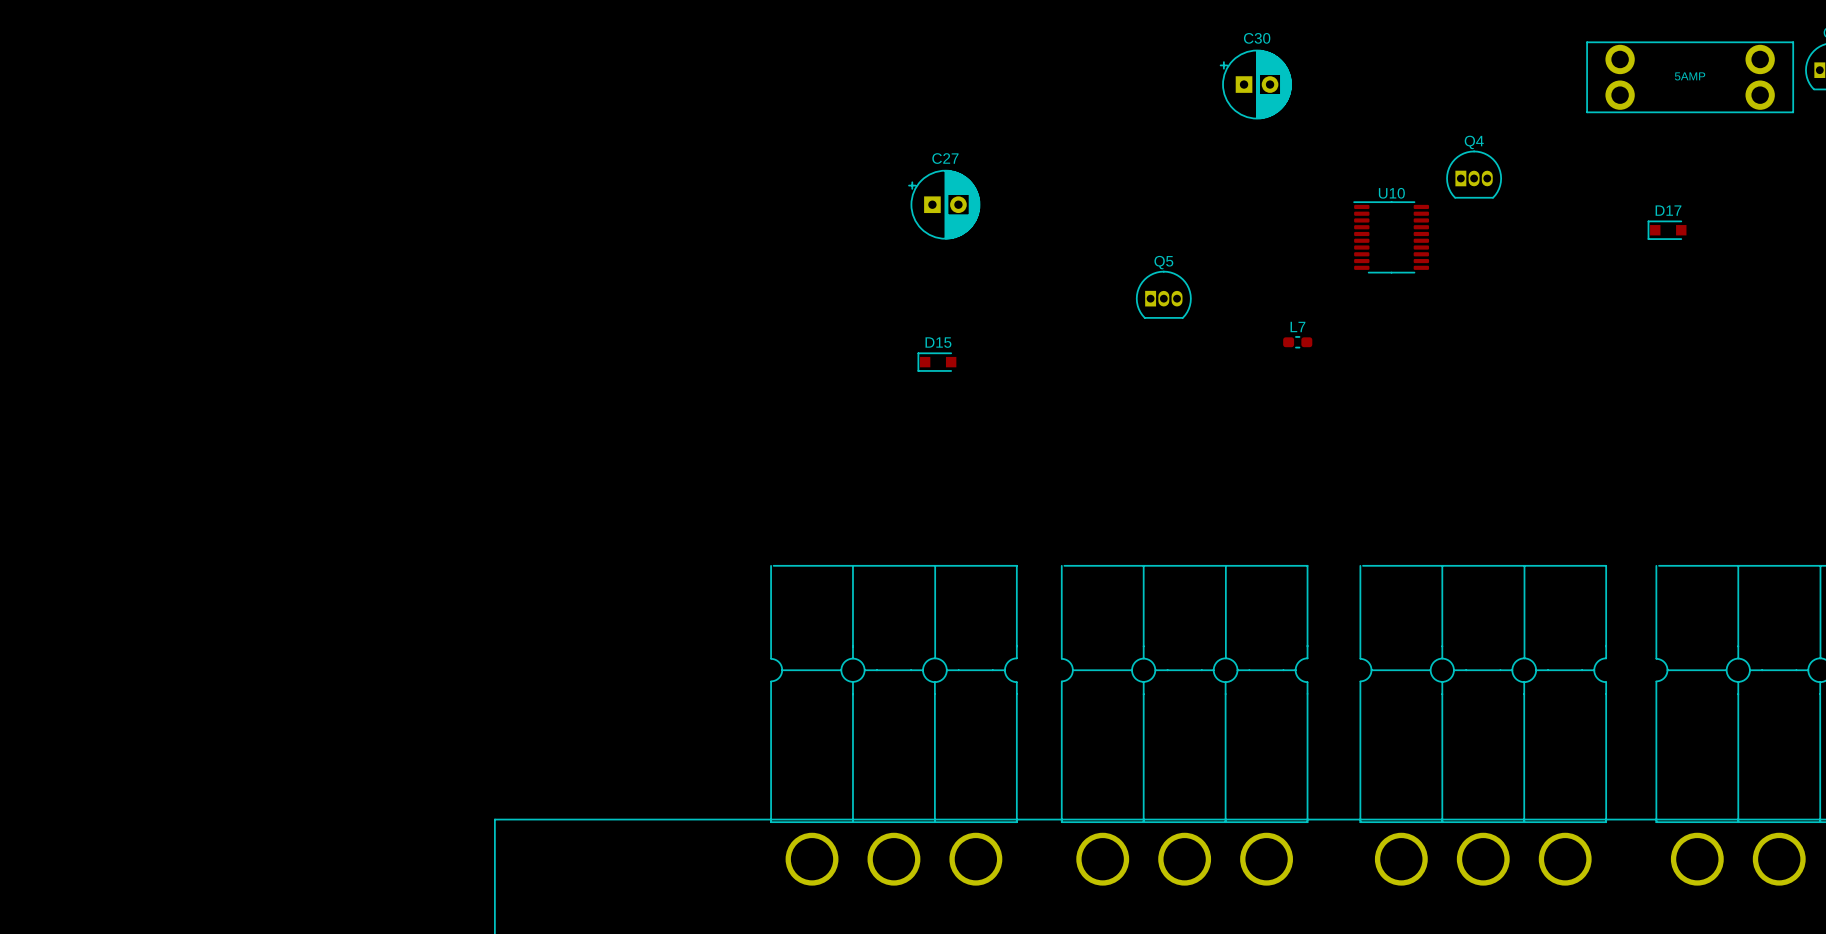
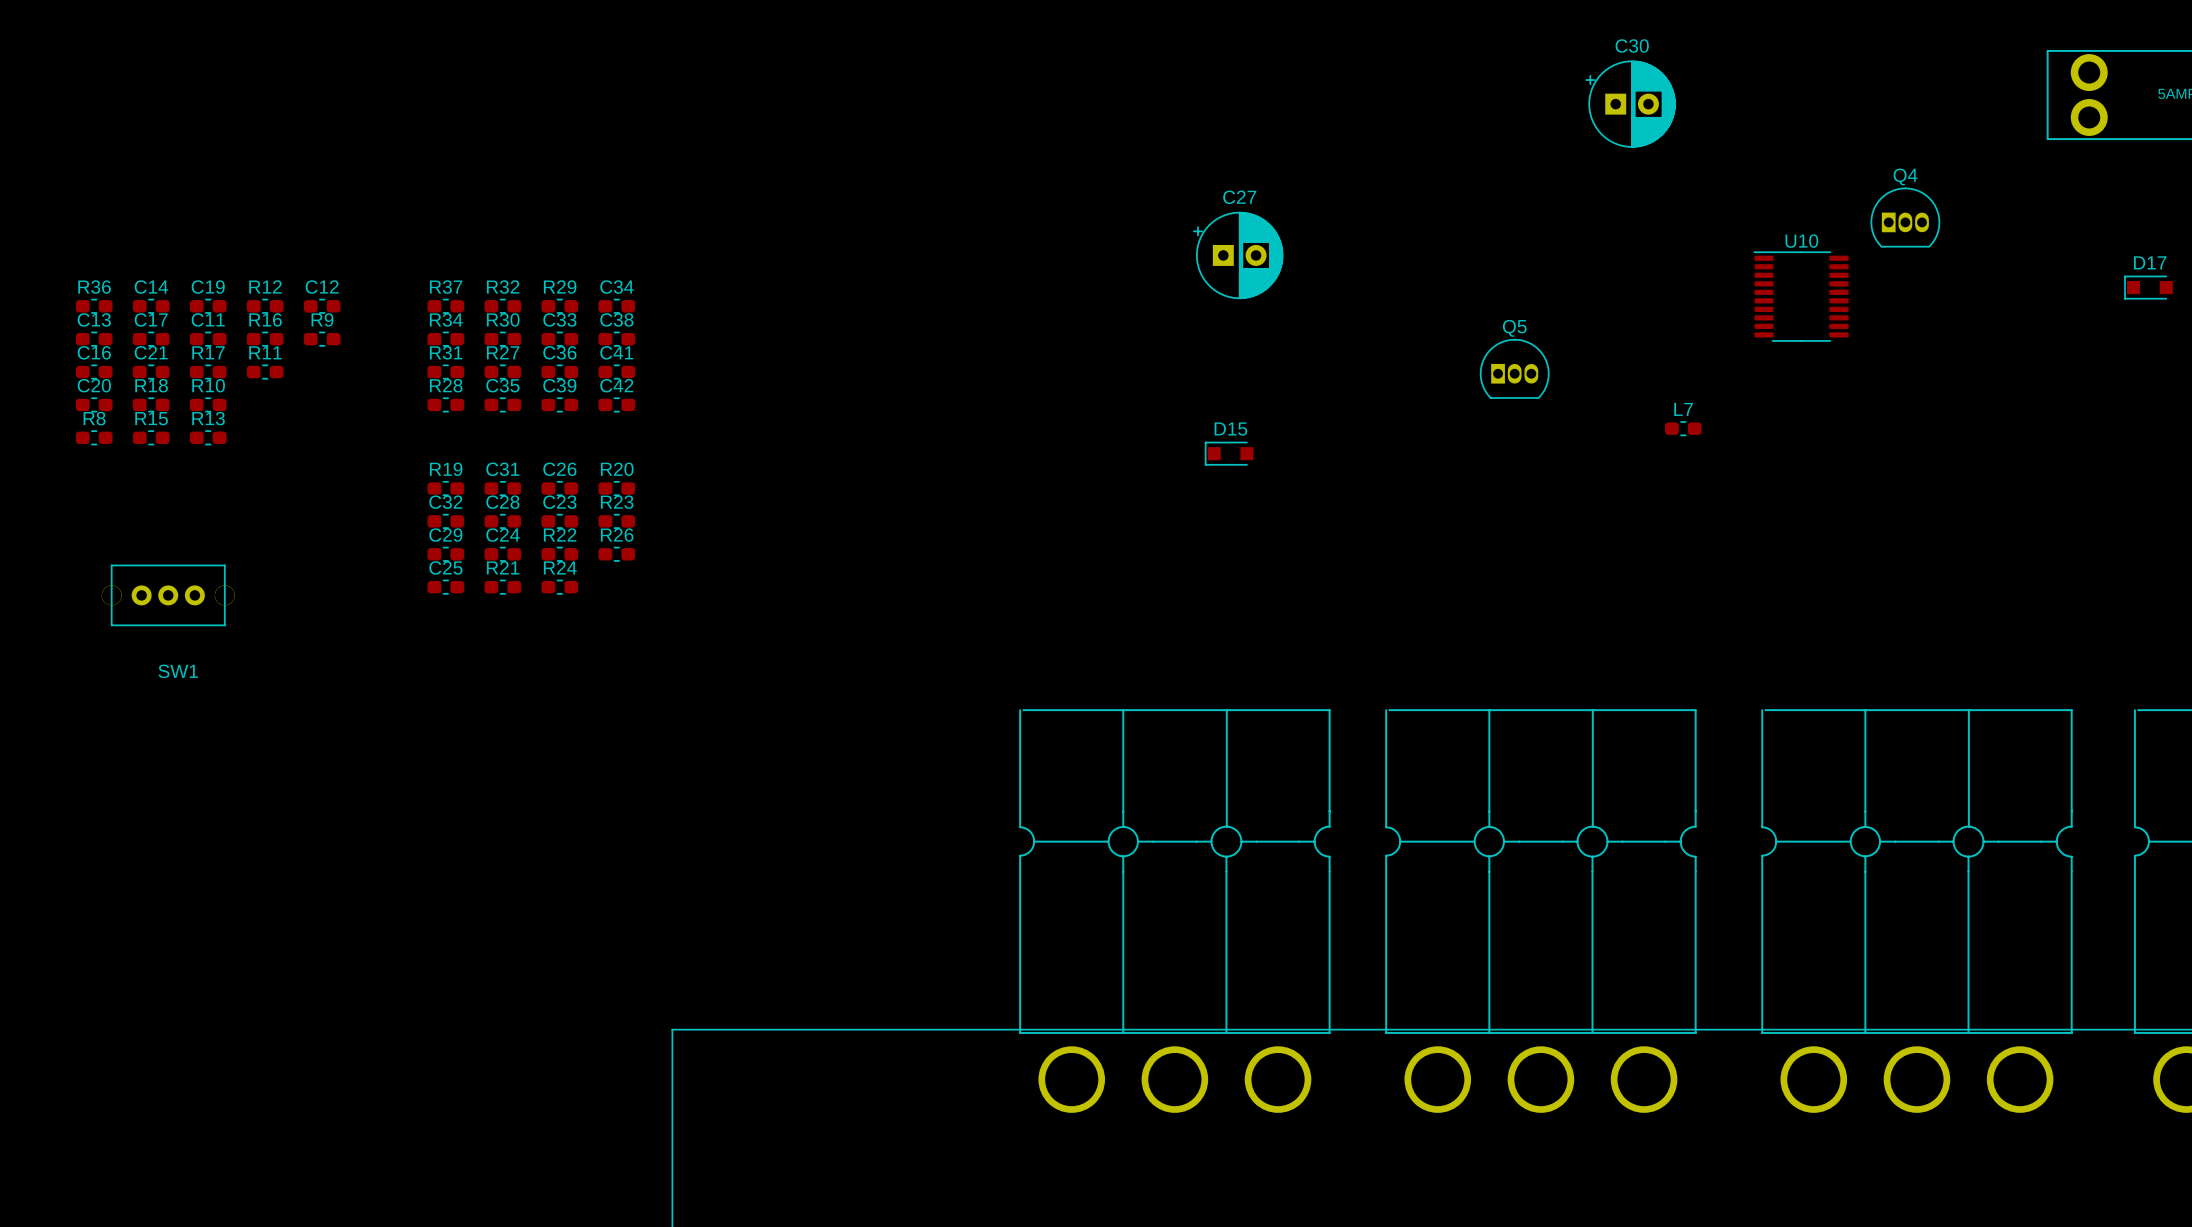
R36: none -> (94, 306)
C14: none -> (151, 306)
C19: none -> (208, 306)
R12: none -> (265, 306)
C12: none -> (322, 306)
R37: none -> (445, 306)
R32: none -> (502, 306)
R29: none -> (559, 306)
C34: none -> (616, 306)
C13: none -> (94, 339)
C17: none -> (151, 339)
C11: none -> (208, 339)
R16: none -> (265, 339)
R9: none -> (322, 339)
R34: none -> (445, 339)
R30: none -> (502, 339)
C33: none -> (559, 339)
C38: none -> (616, 339)
C16: none -> (94, 372)
C21: none -> (151, 372)
R17: none -> (208, 372)
R11: none -> (265, 372)
R31: none -> (445, 372)
R27: none -> (502, 372)
C36: none -> (559, 372)
C41: none -> (616, 372)
C20: none -> (94, 404)
R18: none -> (151, 404)
R10: none -> (208, 404)
R28: none -> (445, 404)
C35: none -> (502, 404)
C39: none -> (559, 404)
C42: none -> (616, 404)
R8: none -> (94, 437)
R15: none -> (151, 437)
R13: none -> (208, 437)
R19: none -> (445, 488)
C31: none -> (502, 488)
C26: none -> (559, 488)
R20: none -> (616, 488)
C32: none -> (445, 521)
C28: none -> (502, 521)
C23: none -> (559, 521)
R23: none -> (616, 521)
C29: none -> (445, 554)
C24: none -> (502, 554)
R22: none -> (559, 554)
R26: none -> (616, 554)
C25: none -> (445, 587)
R21: none -> (502, 587)
R24: none -> (559, 587)
SW1: none -> (168, 595)

